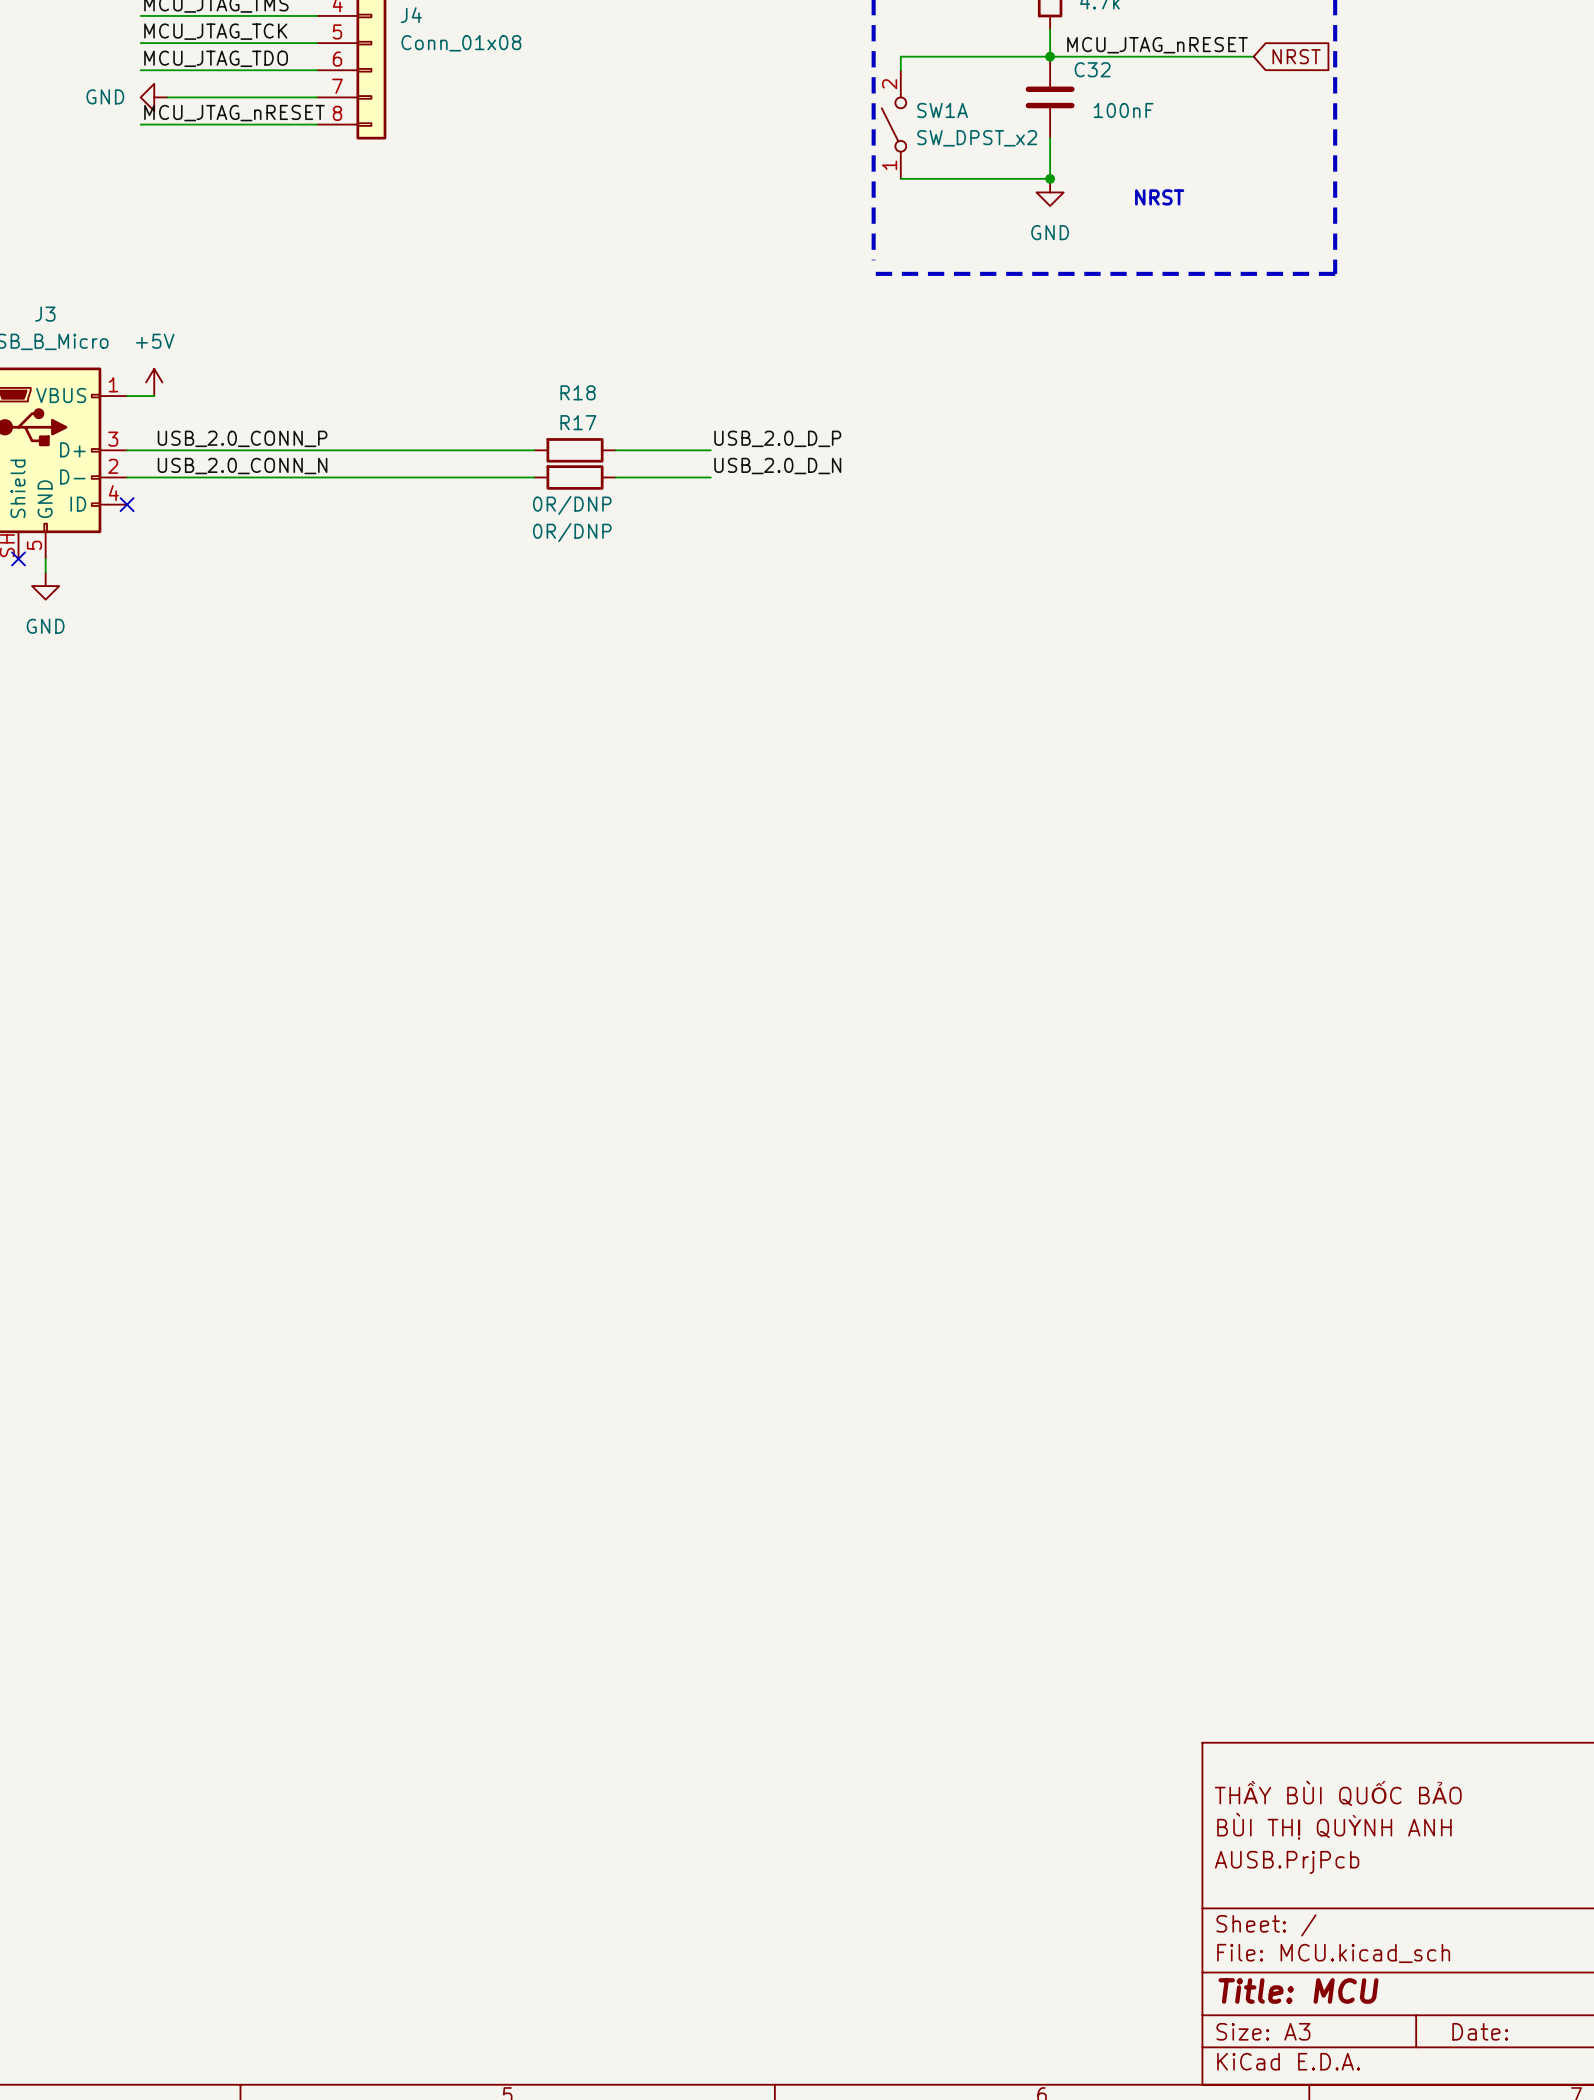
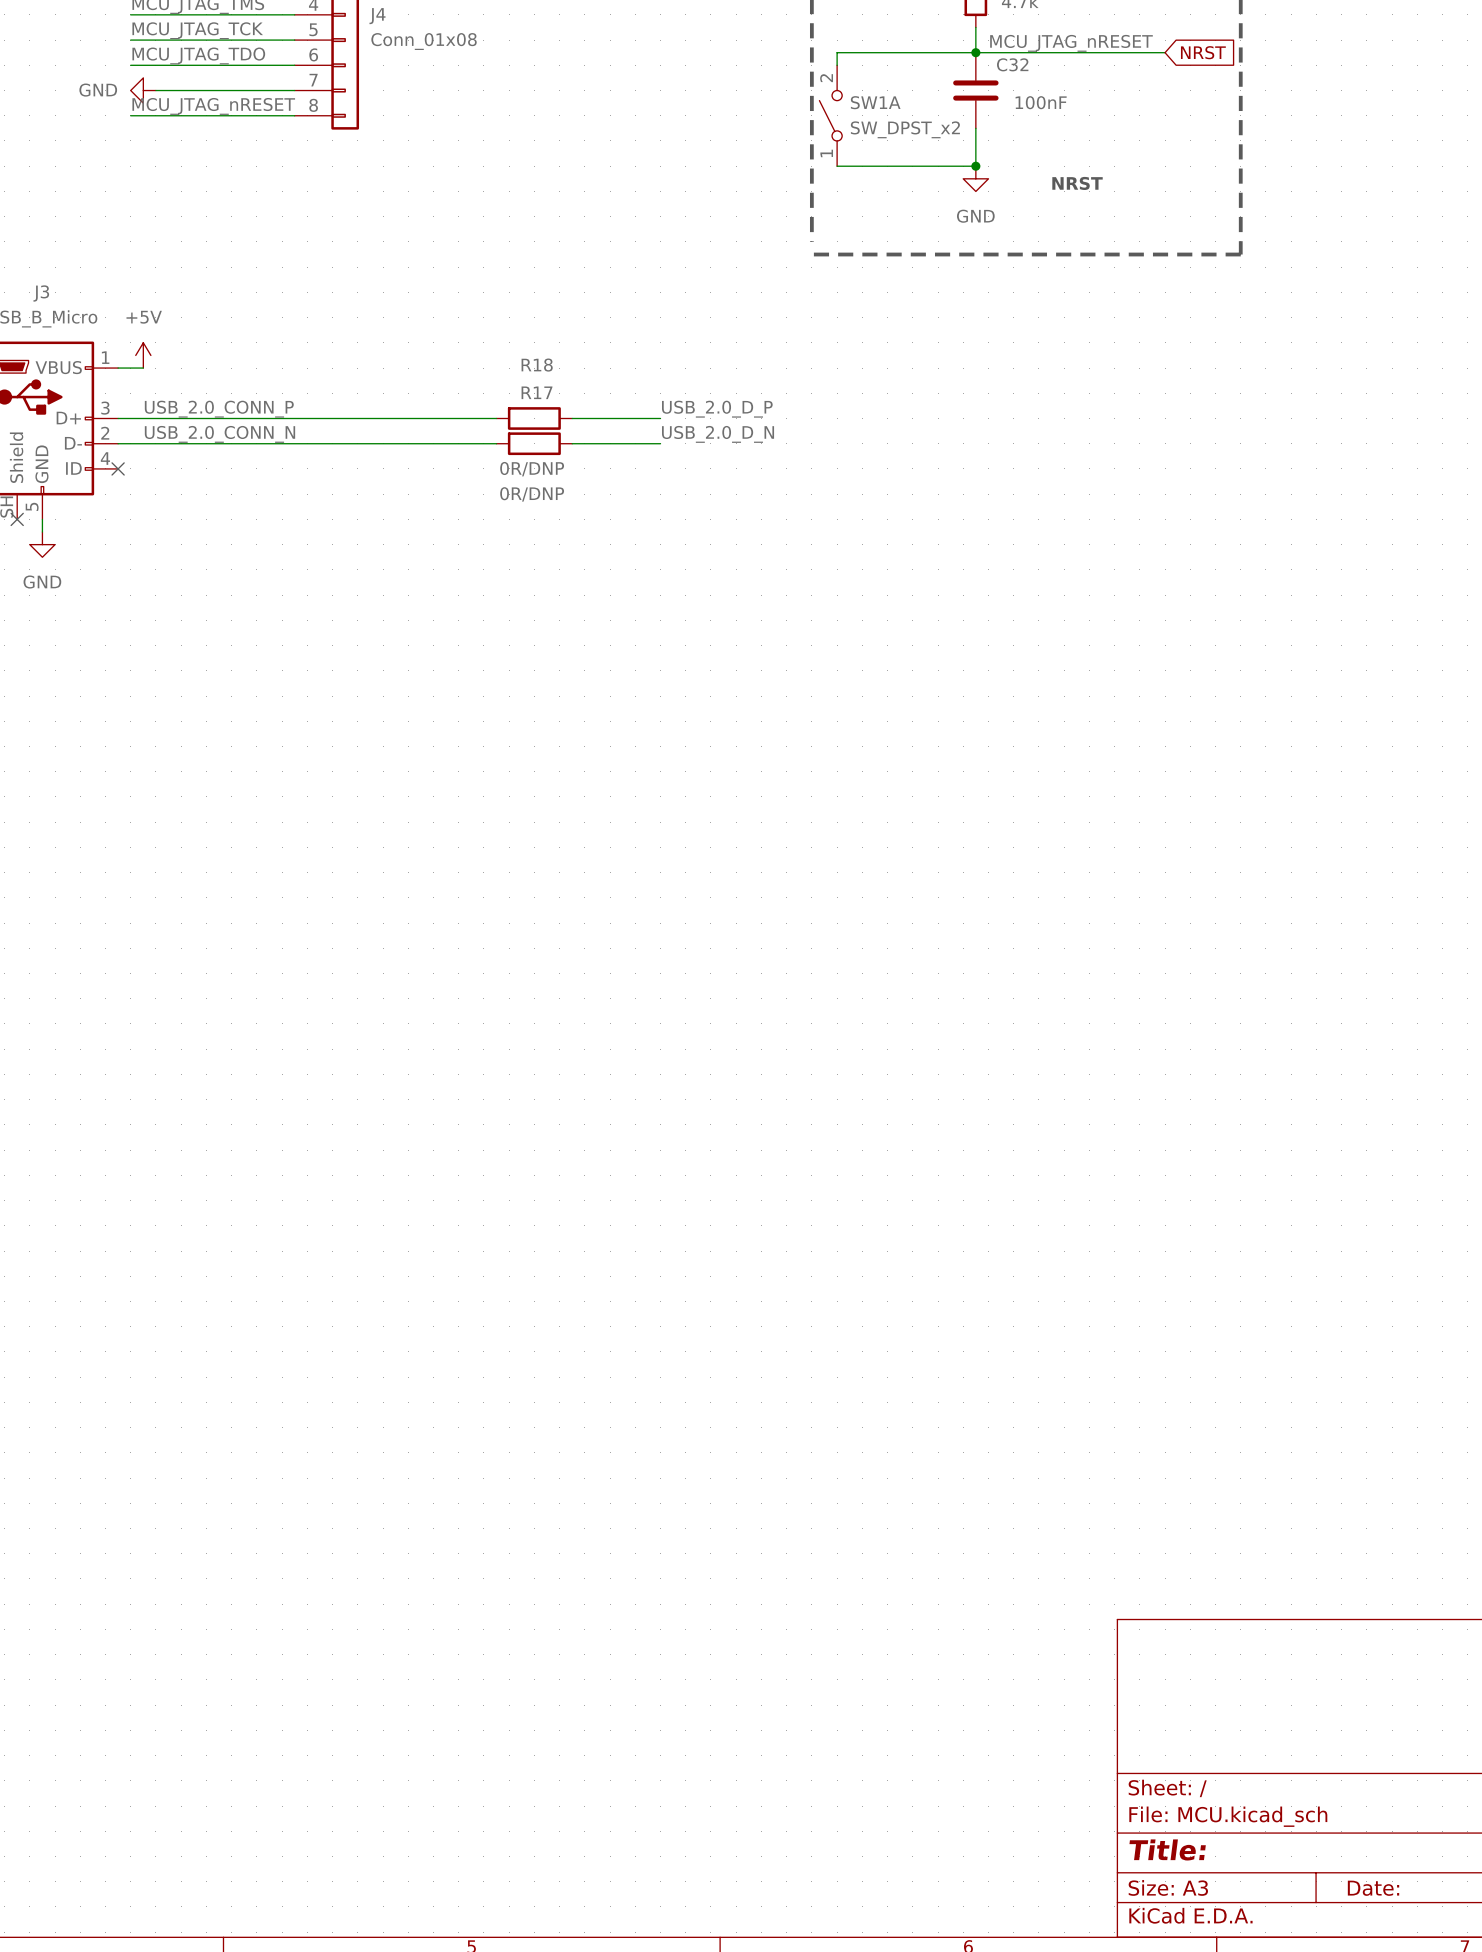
title block: THẦY BÙI QUỐC BẢO (1338, 1793) -> none
title block: BÙI THỊ QUỲNH ANH (1334, 1826) -> none
title block: AUSB.PrjPcb (1287, 1862) -> none
title block: Title: MCU (1298, 1990) -> Title: (1167, 1849)

